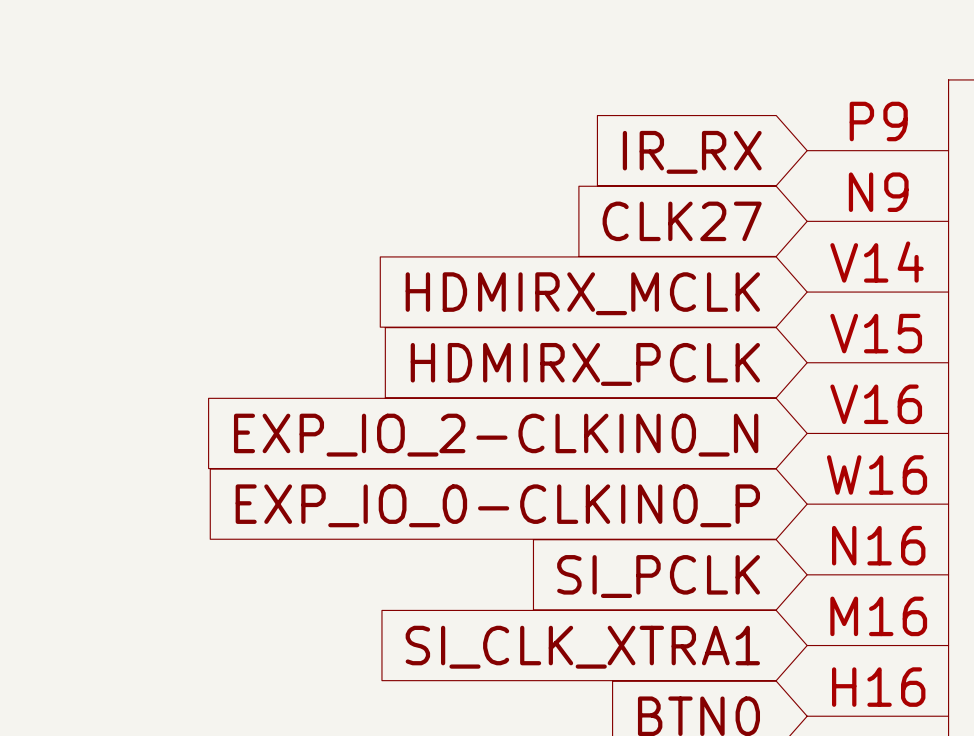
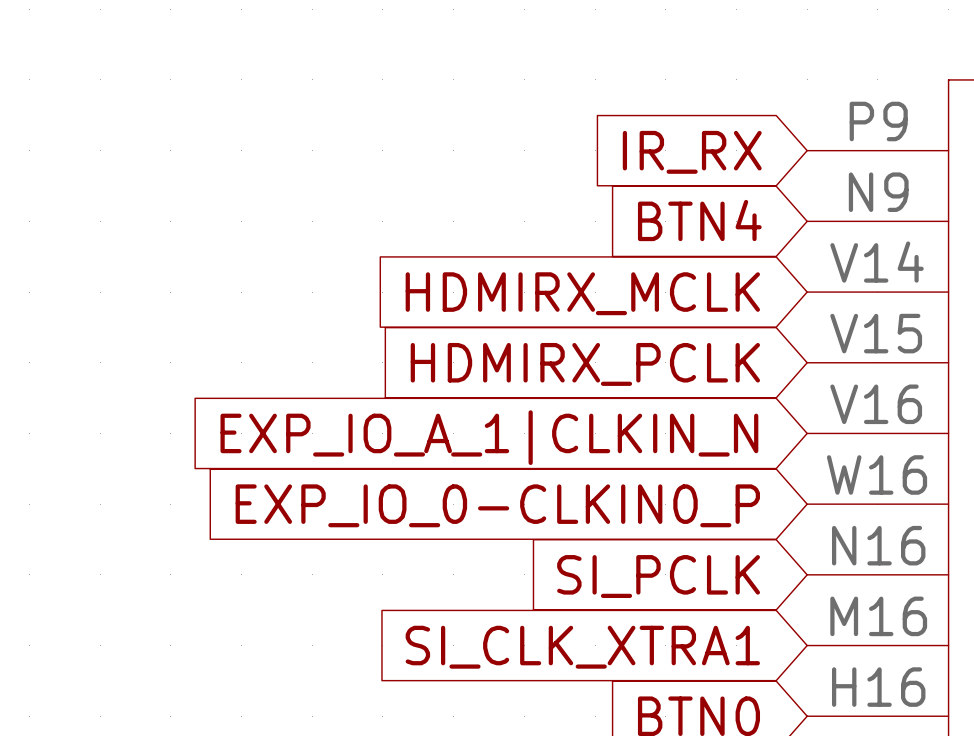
global label: CLK27 (682, 221) -> BTN4 (699, 220)
global label: EXP_IO_2-CLKIN0_N (496, 435) -> EXP_IO_A_1|CLKIN_N (489, 437)

